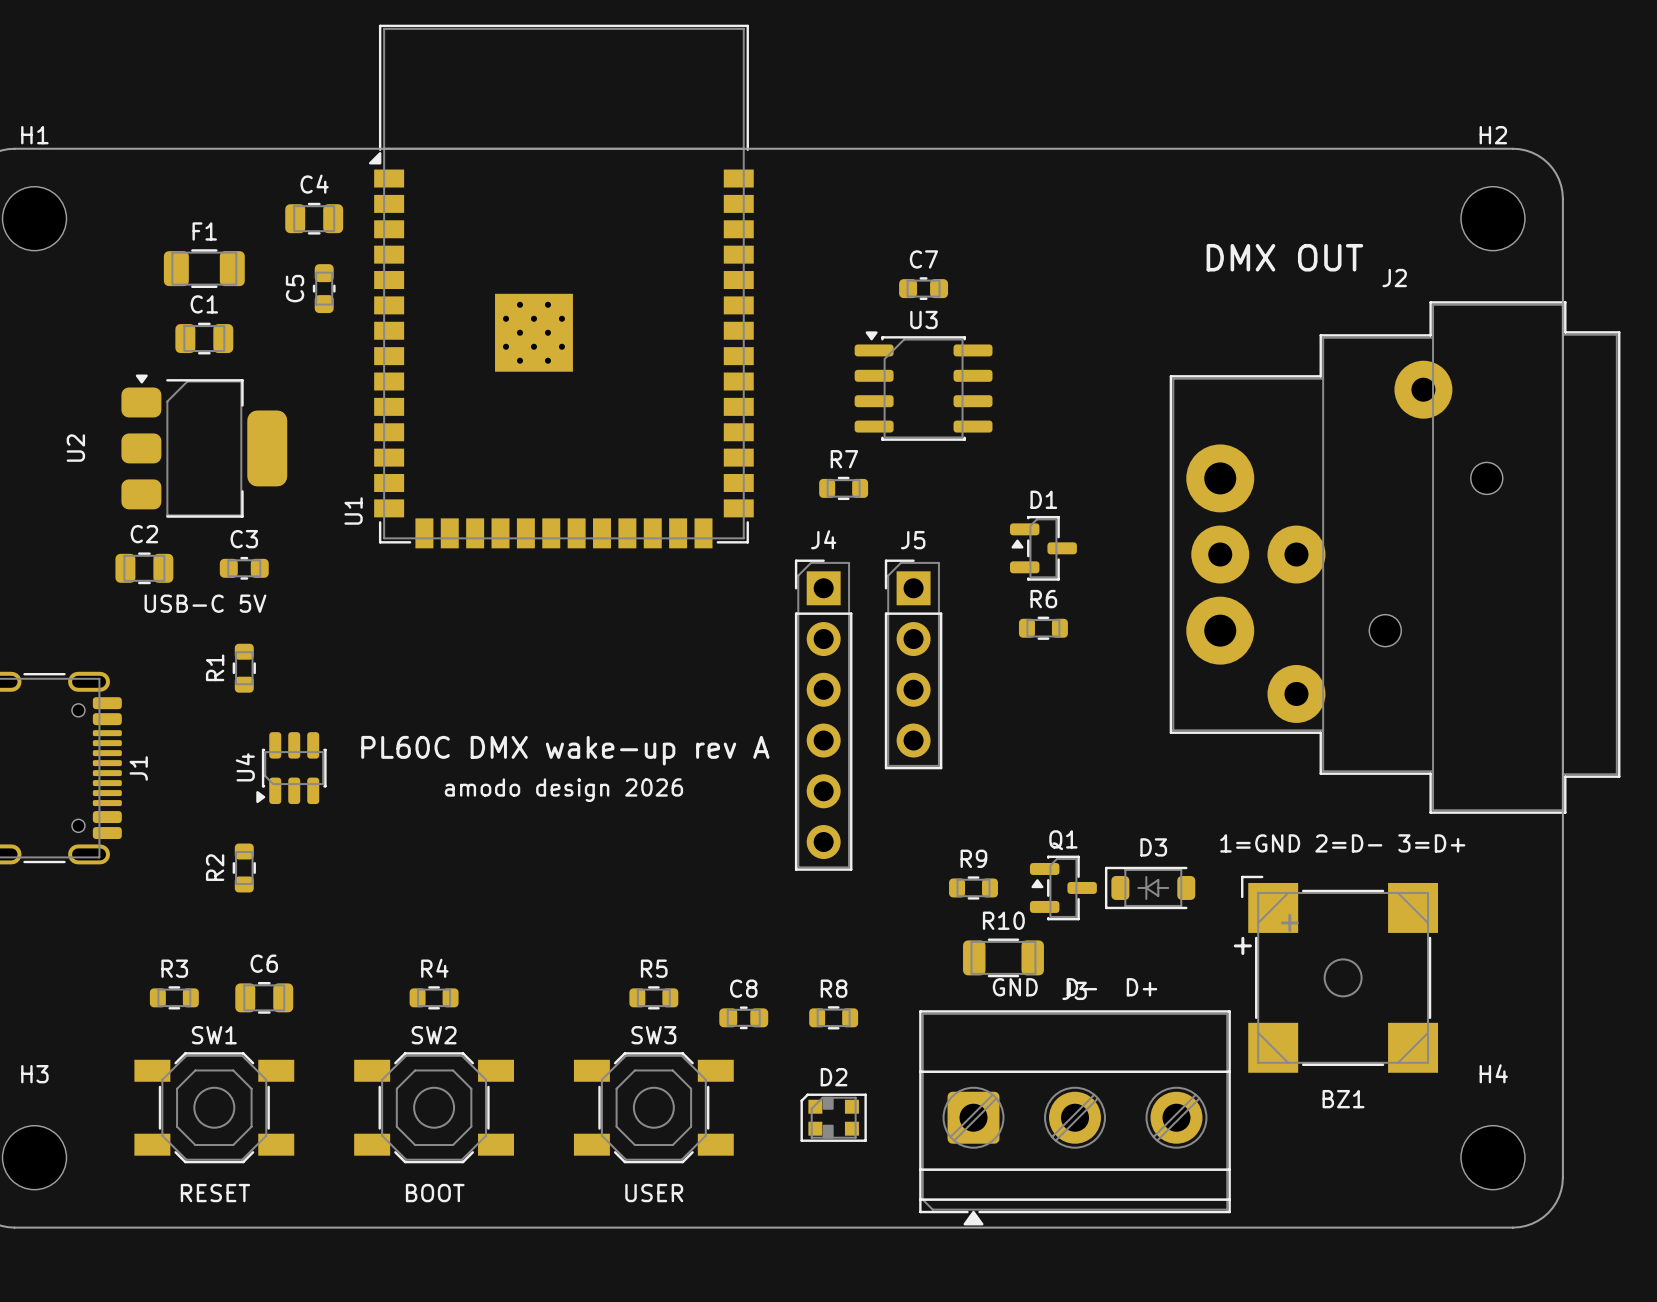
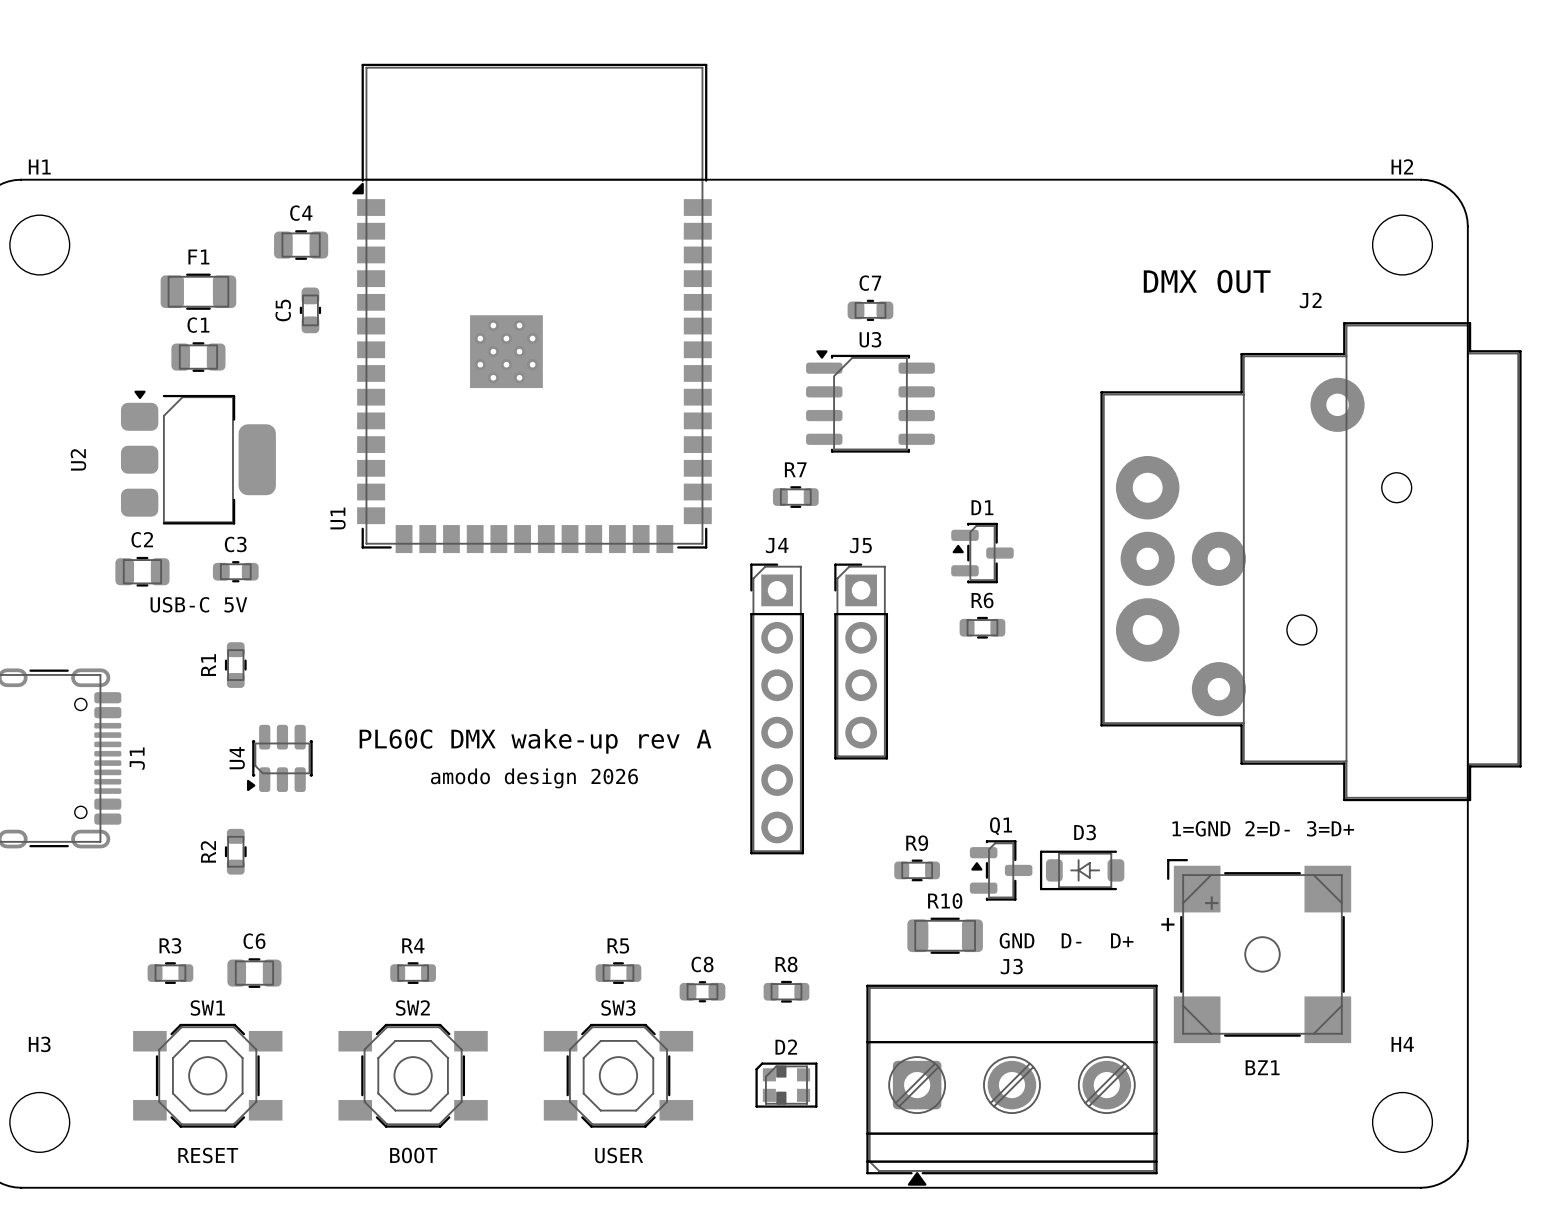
text position: GND D- D+ (1075, 987) -> GND D- D+ (1066, 940)

